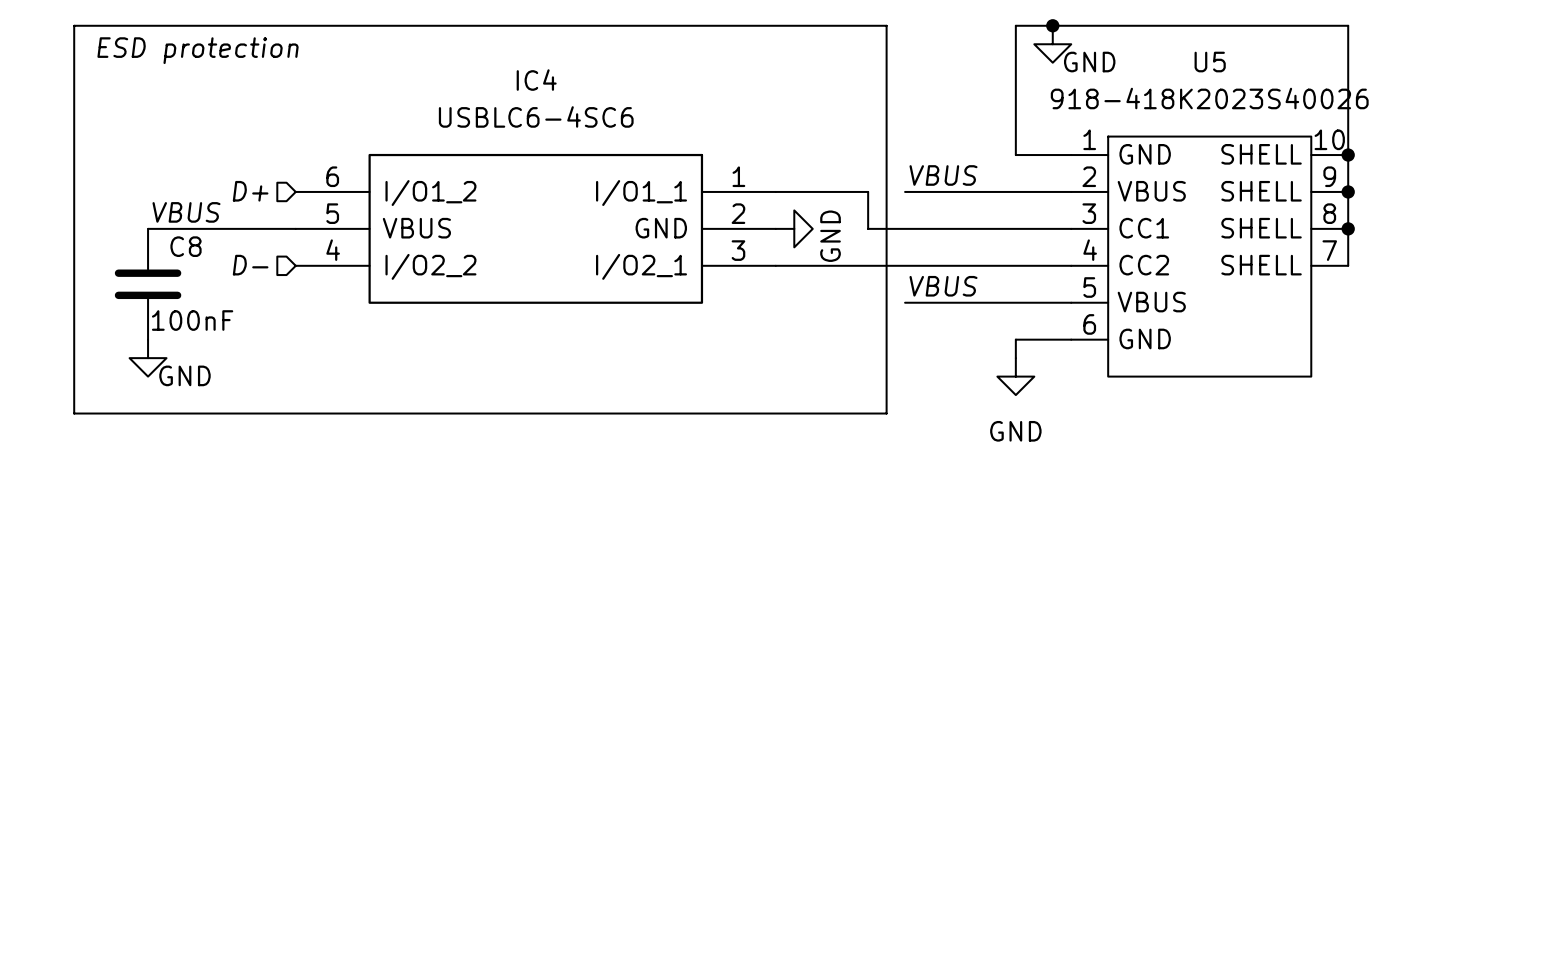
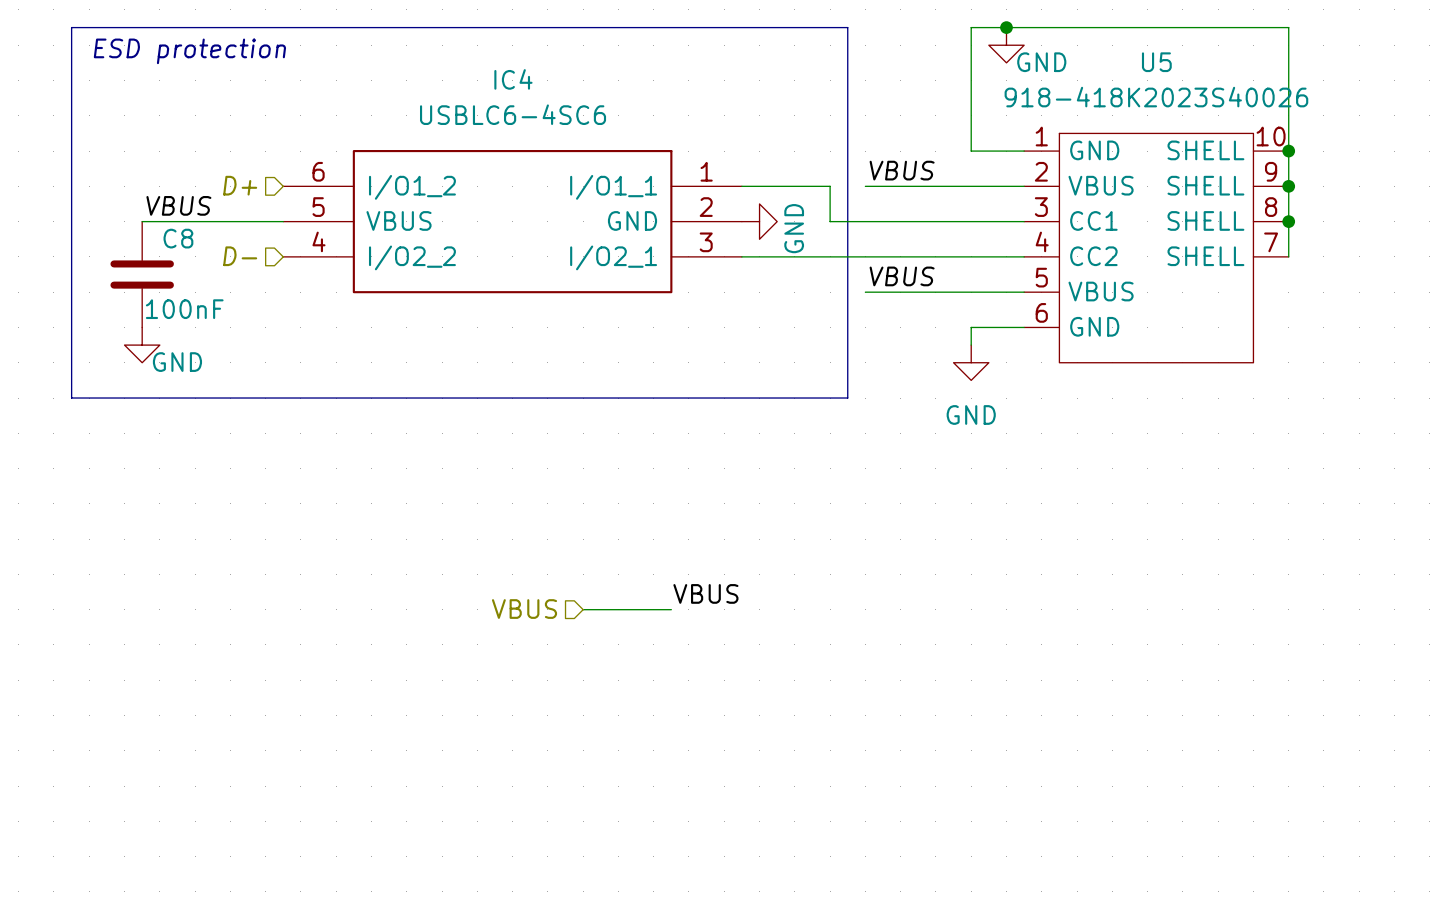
label: none -> VBUS (705, 593)
hierarchical label: none -> VBUS (524, 609)
wire: none -> (583, 609) (671, 609)

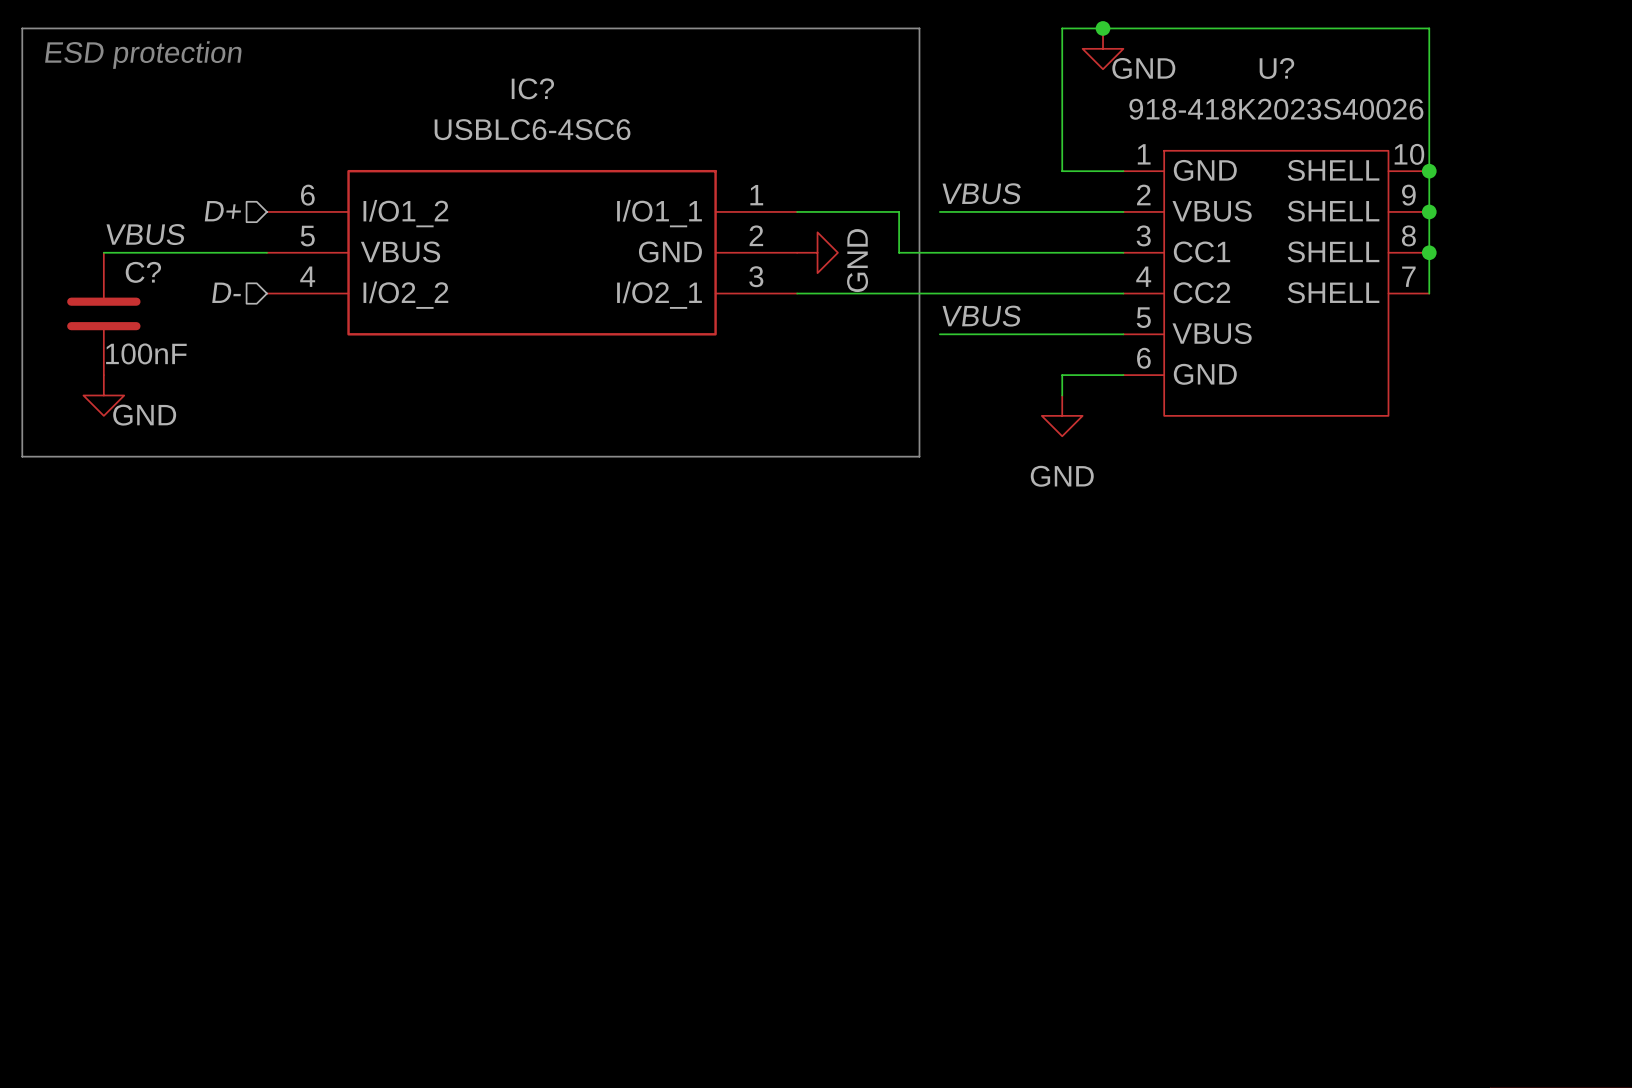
U5 name: U5 (1156, 62) -> U? (1276, 68)
IC4 name: IC4 (513, 79) -> IC? (532, 88)
C8 name: C8 (178, 238) -> C? (143, 272)
label: VBUS (705, 593) -> none
hierarchical label: VBUS (524, 609) -> none
wire: (583, 609) (671, 609) -> none

